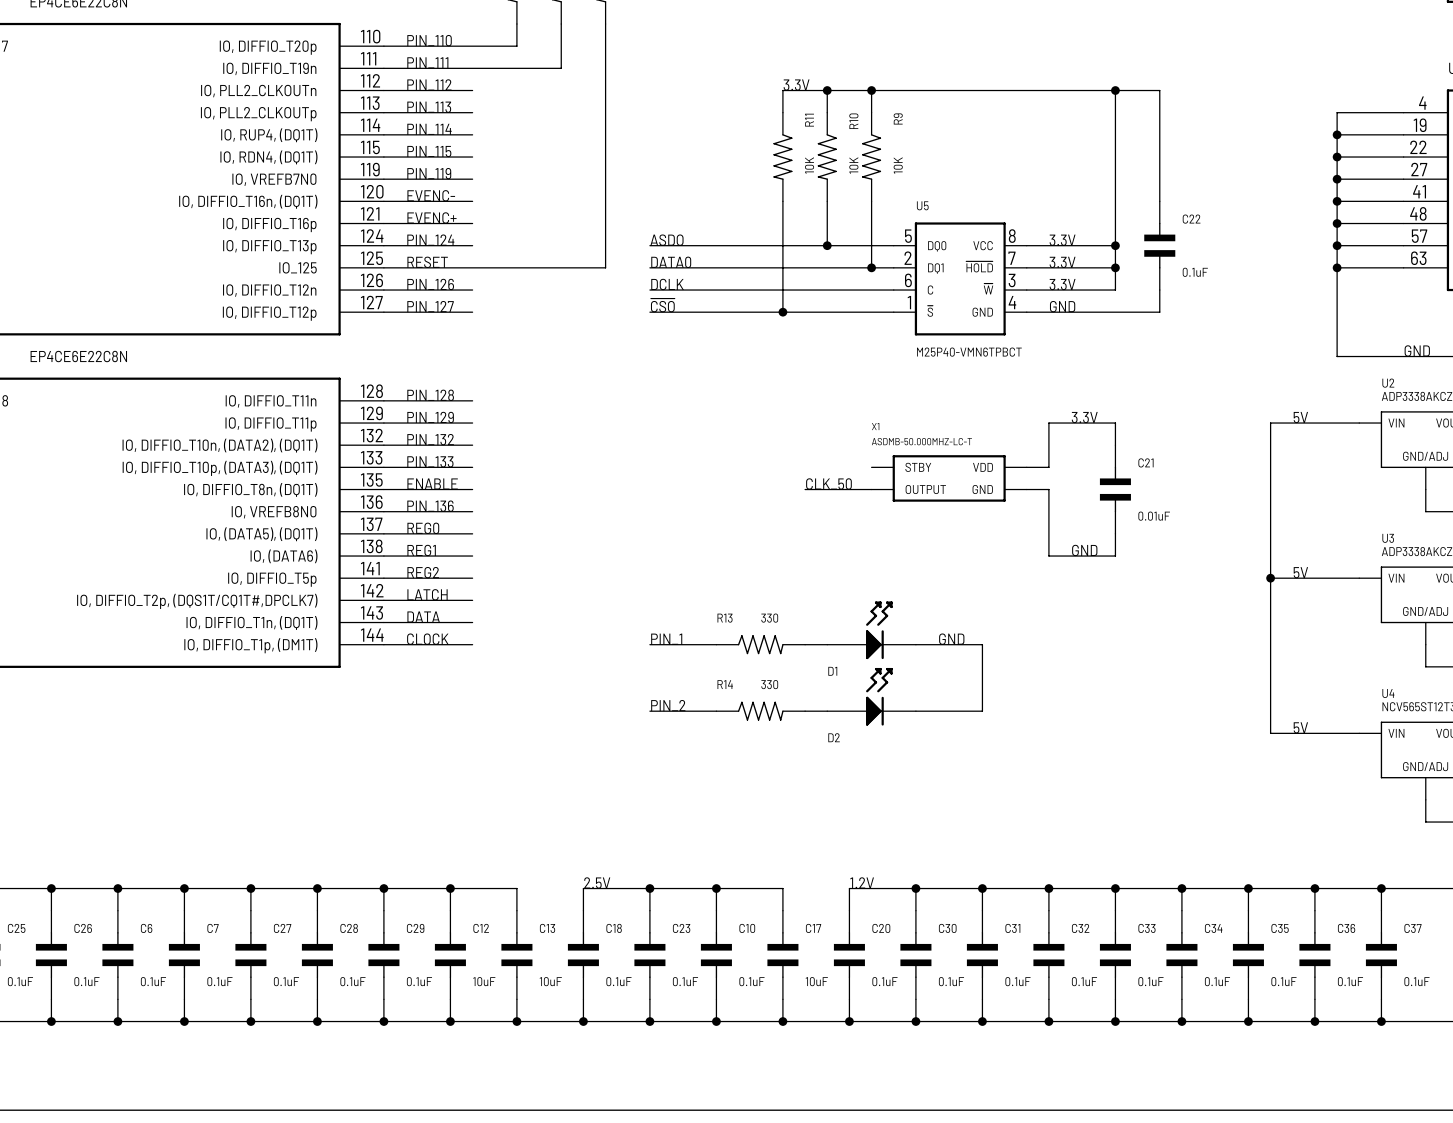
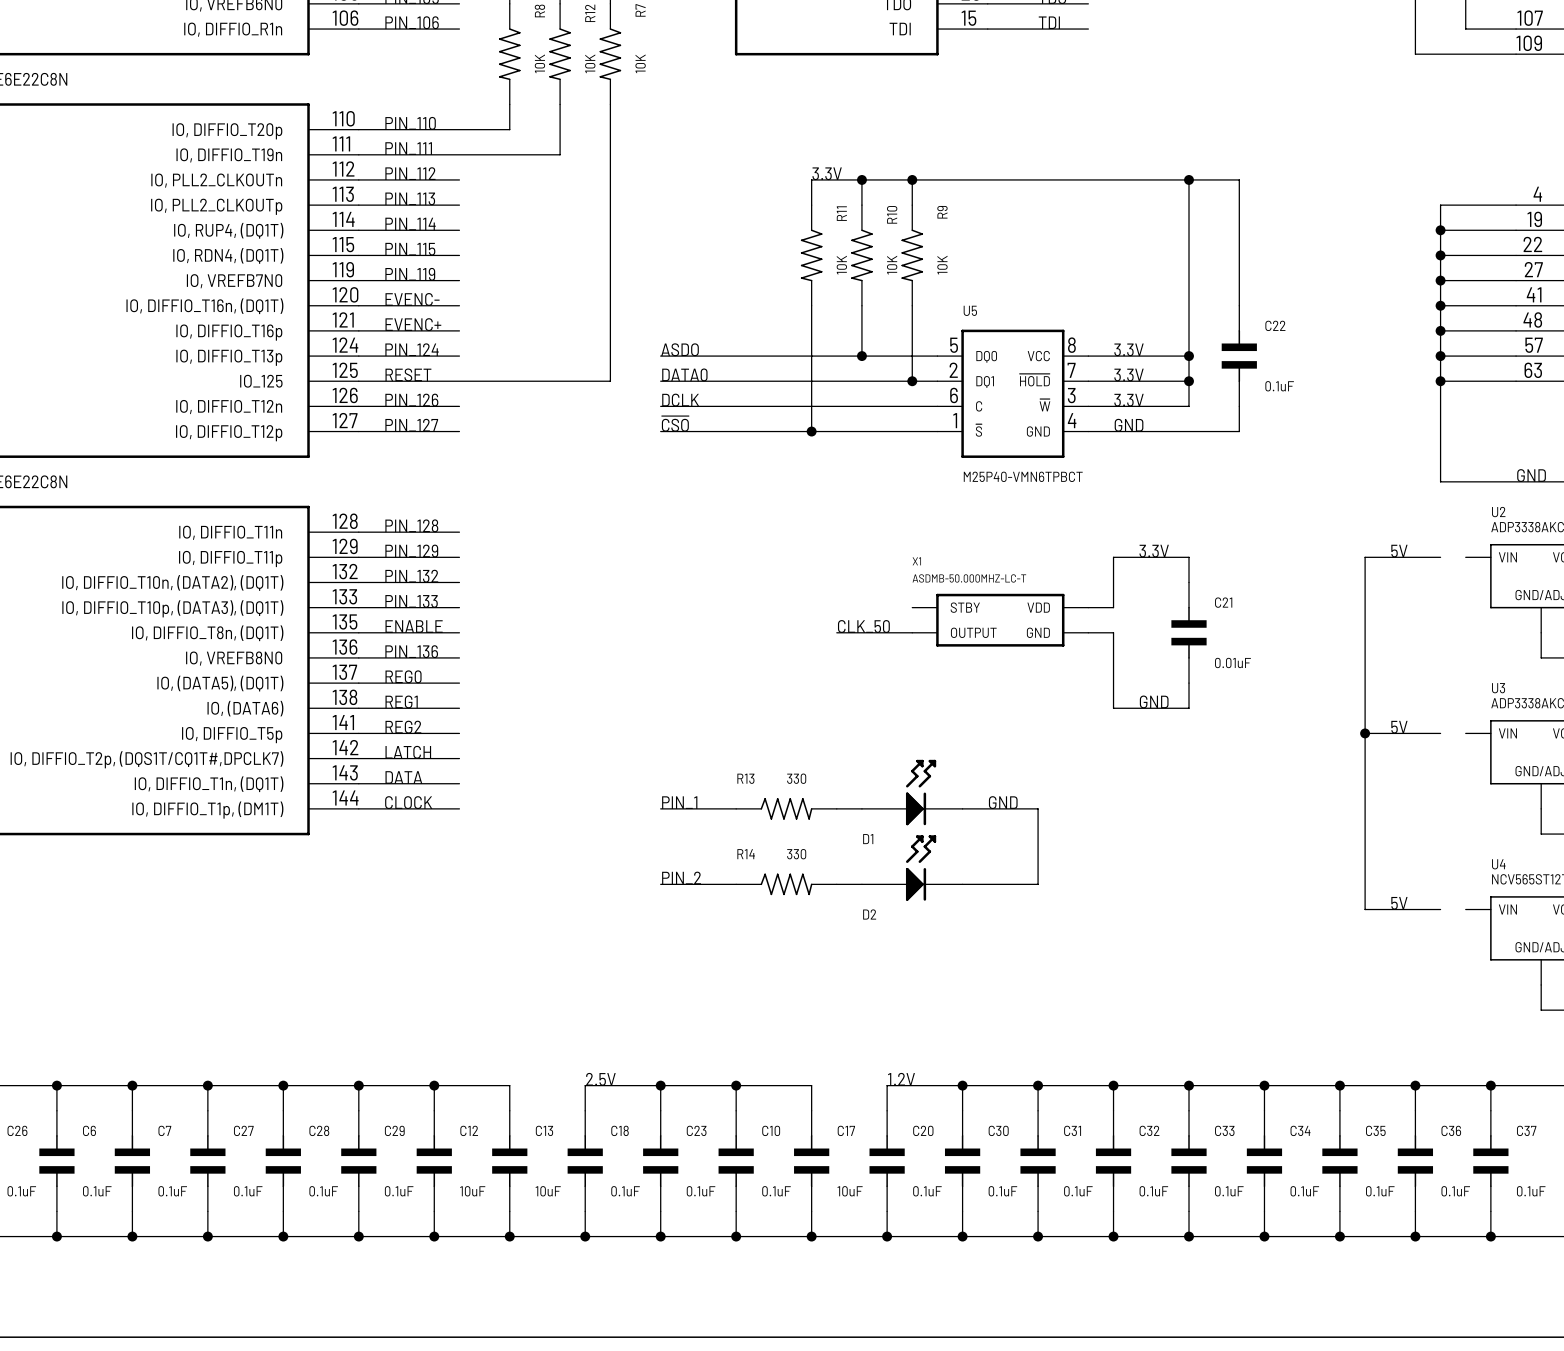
wire: (1337, 423) (1359, 423) -> none
wire: (1337, 578) (1359, 578) -> none
wire: (1337, 733) (1359, 733) -> none

